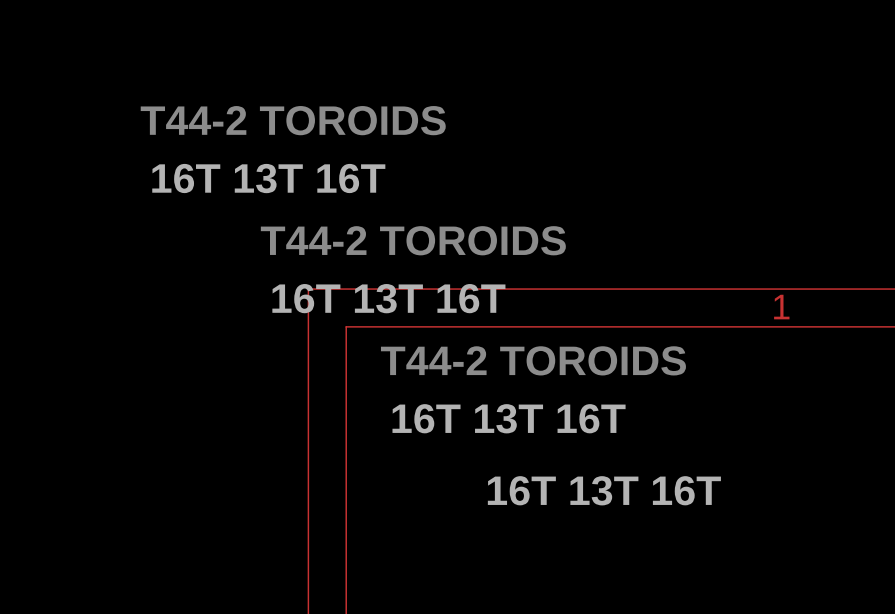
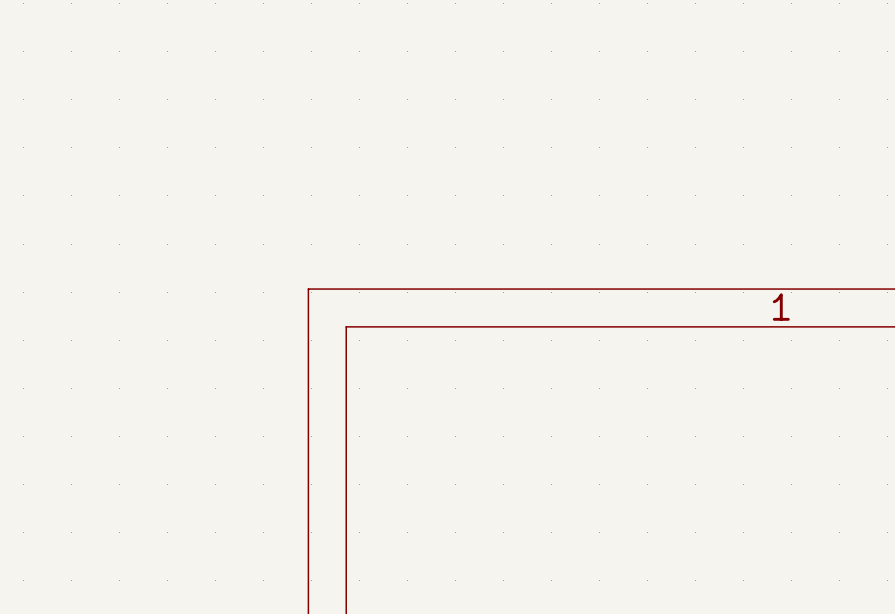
text: T44-2 TOROIDS (293, 120) -> none
label: 16T 13T 16T (268, 178) -> none
text: T44-2 TOROIDS (413, 240) -> none
label: 16T 13T 16T (388, 298) -> none
text: T44-2 TOROIDS (533, 360) -> none
label: 16T 13T 16T (509, 418) -> none
label: 16T 13T 16T (604, 490) -> none

